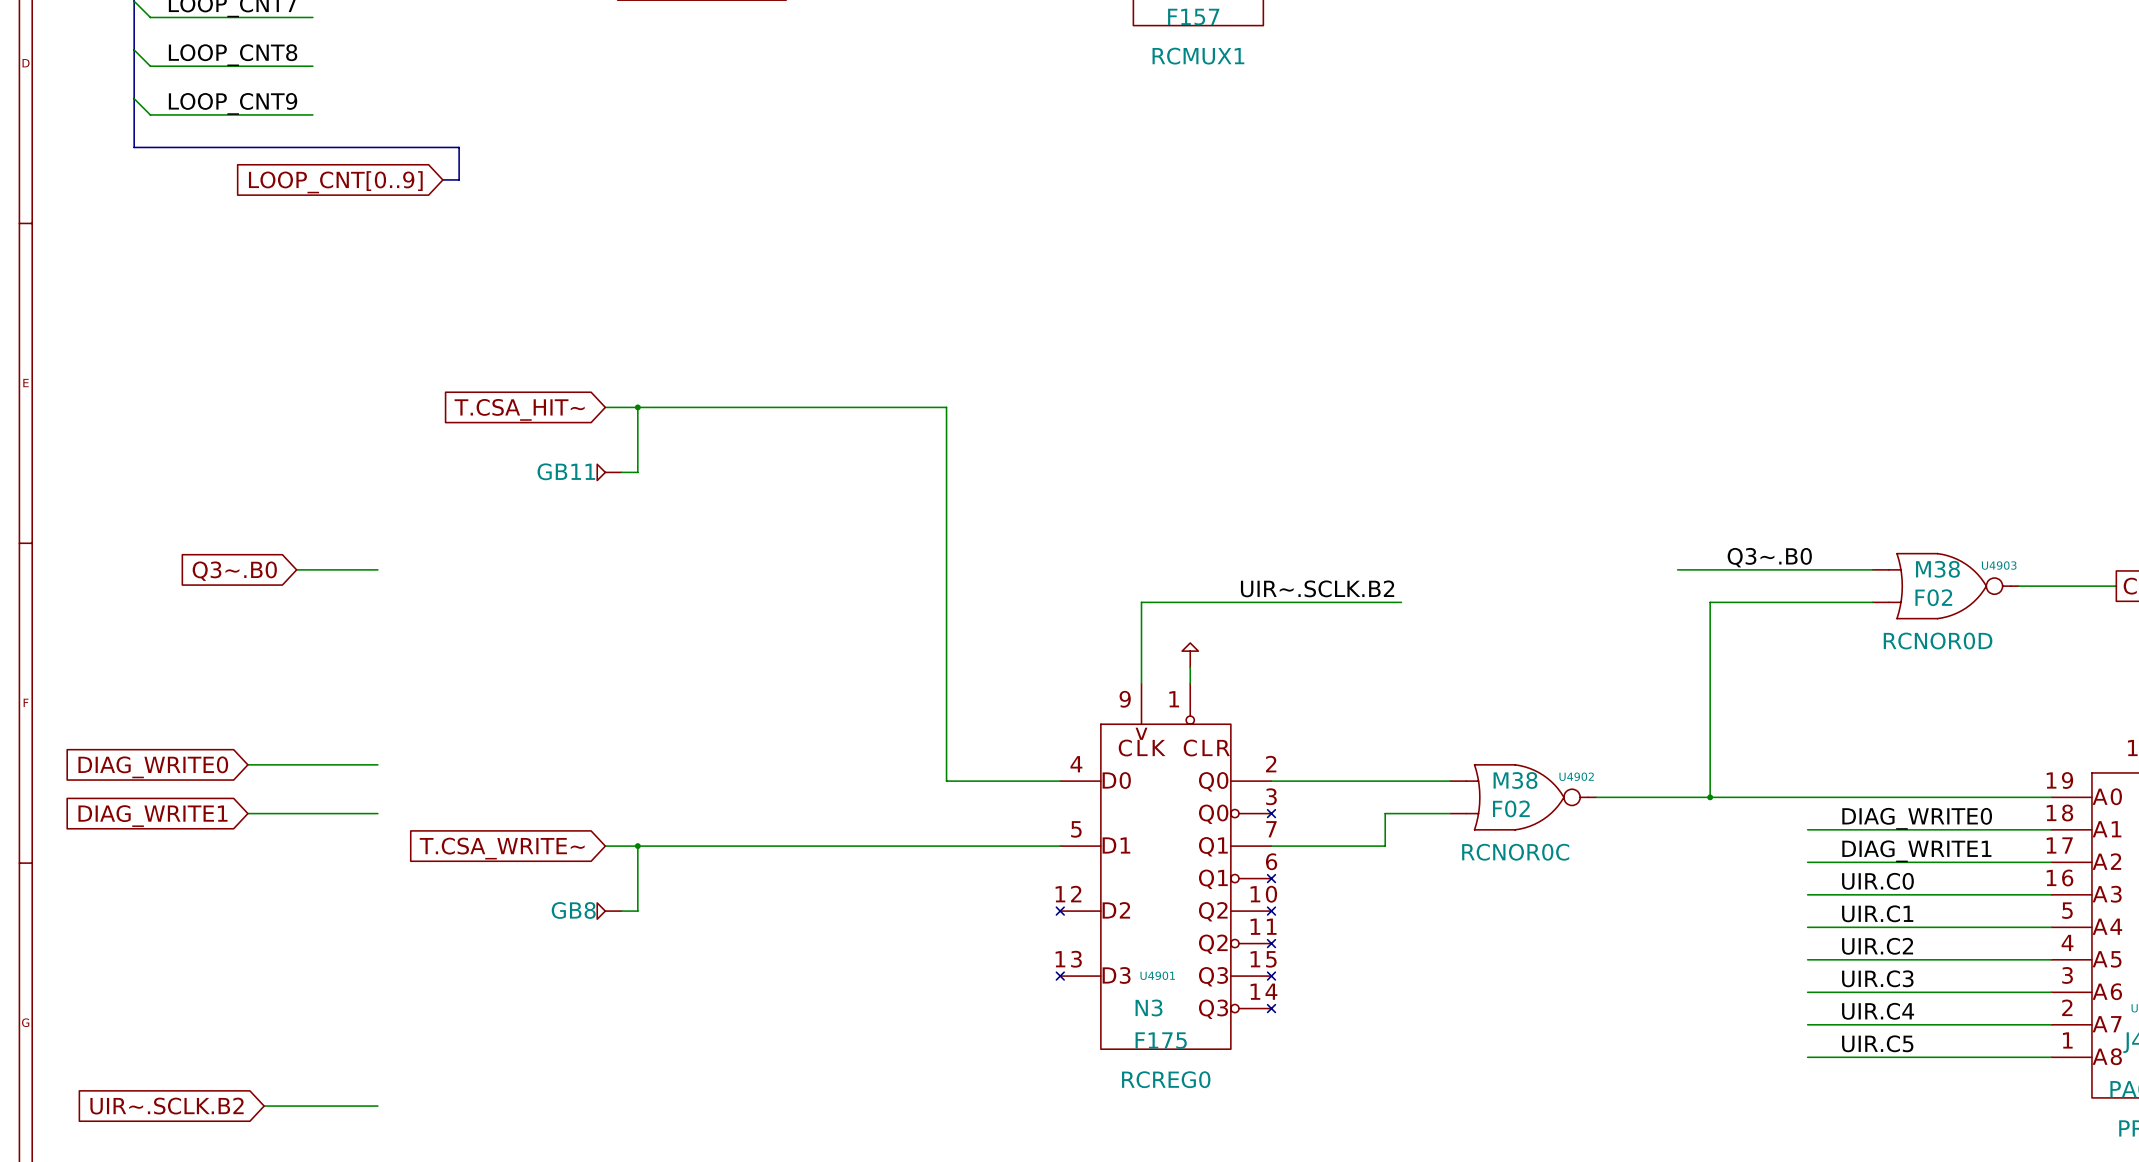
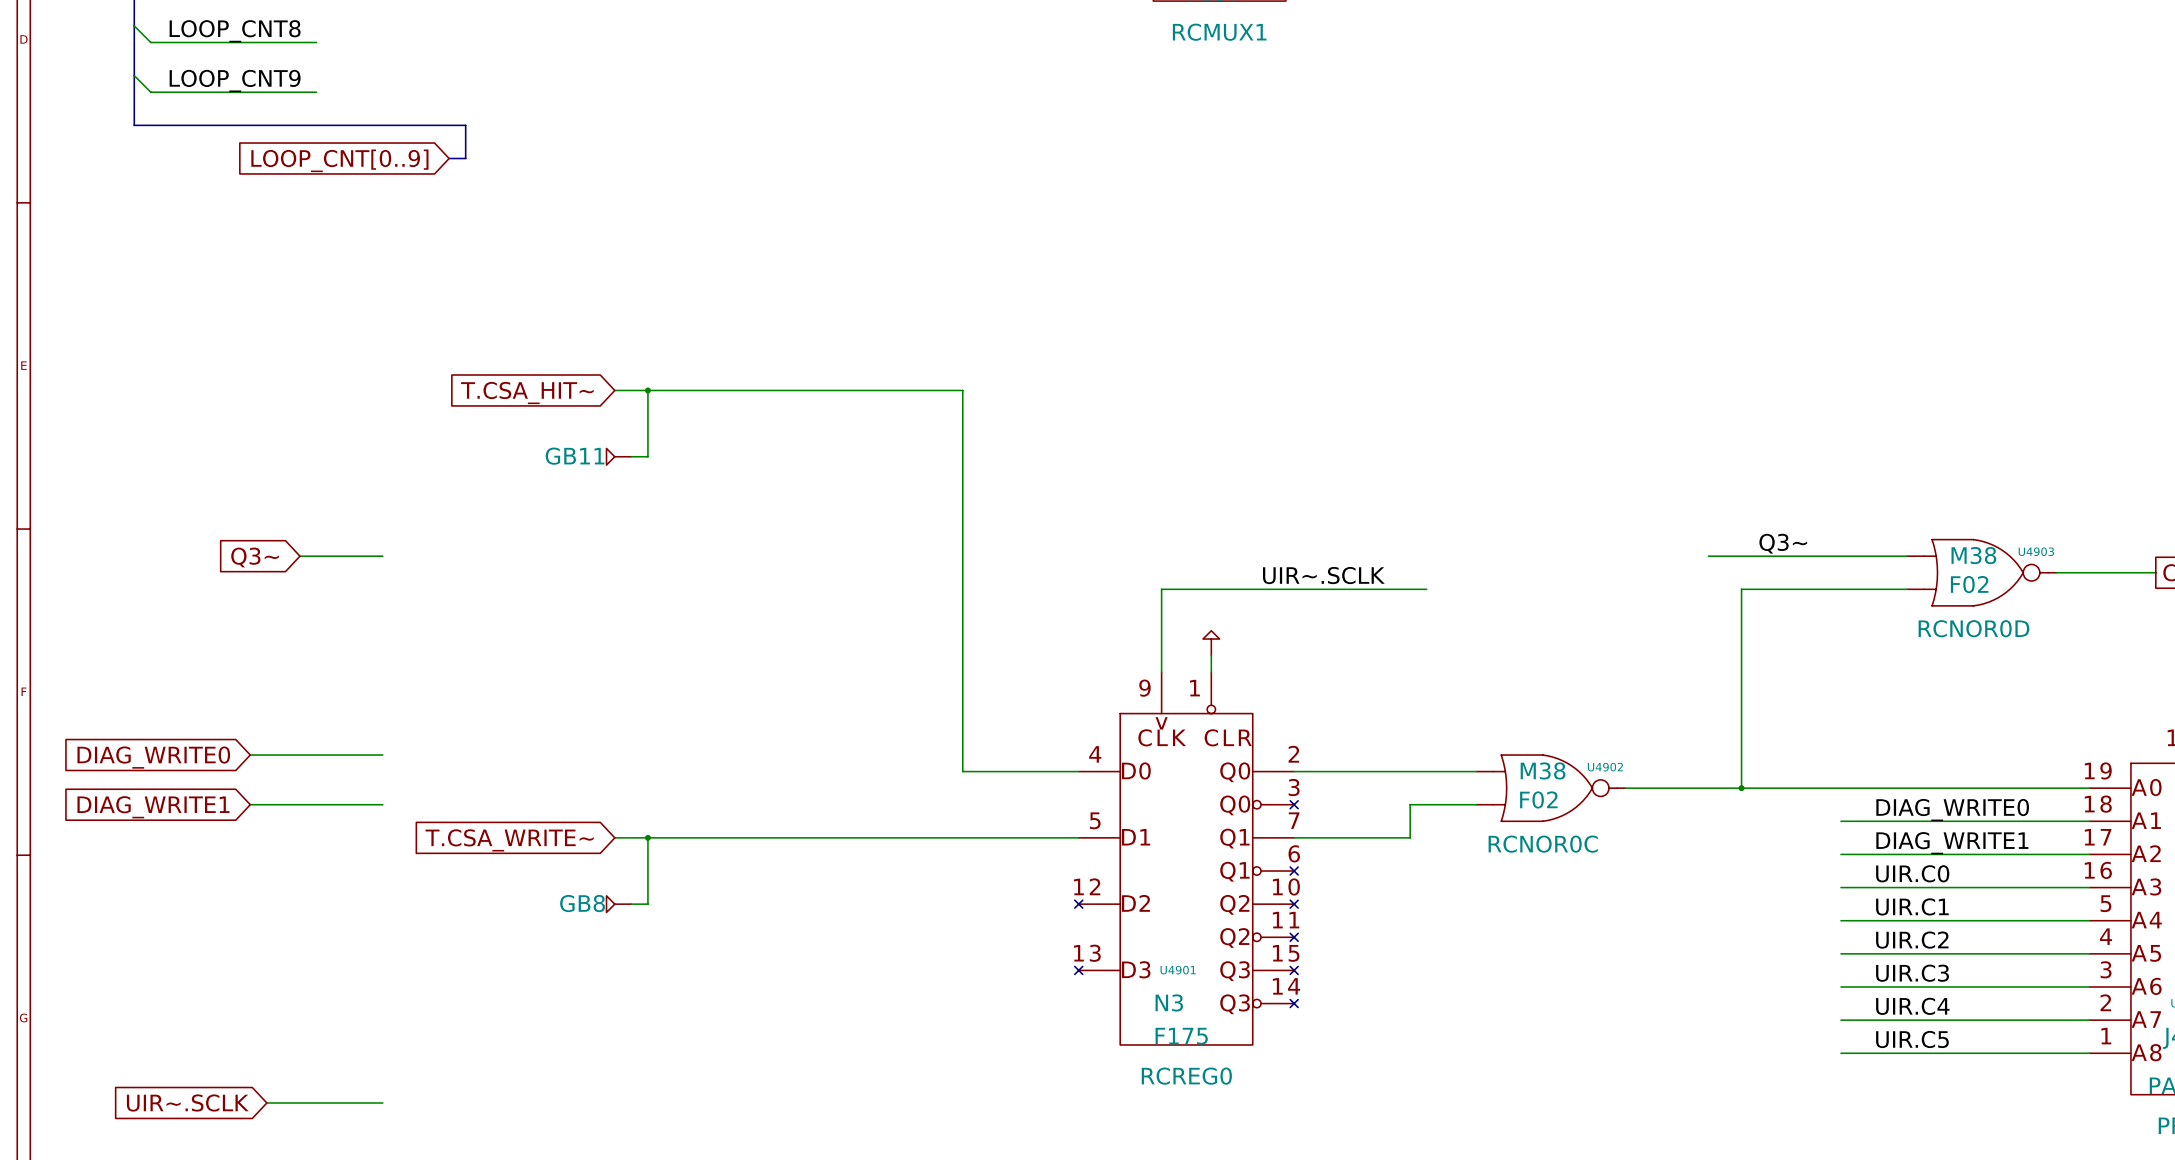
label: Q3~.B0 (1769, 557) -> Q3~ (1783, 543)
global label: Q3~.B0 (234, 571) -> Q3~ (255, 557)
label: UIR~.SCLK.B2 (1317, 588) -> UIR~.SCLK (1323, 575)
global label: UIR~.SCLK.B2 (167, 1106) -> UIR~.SCLK (187, 1103)

